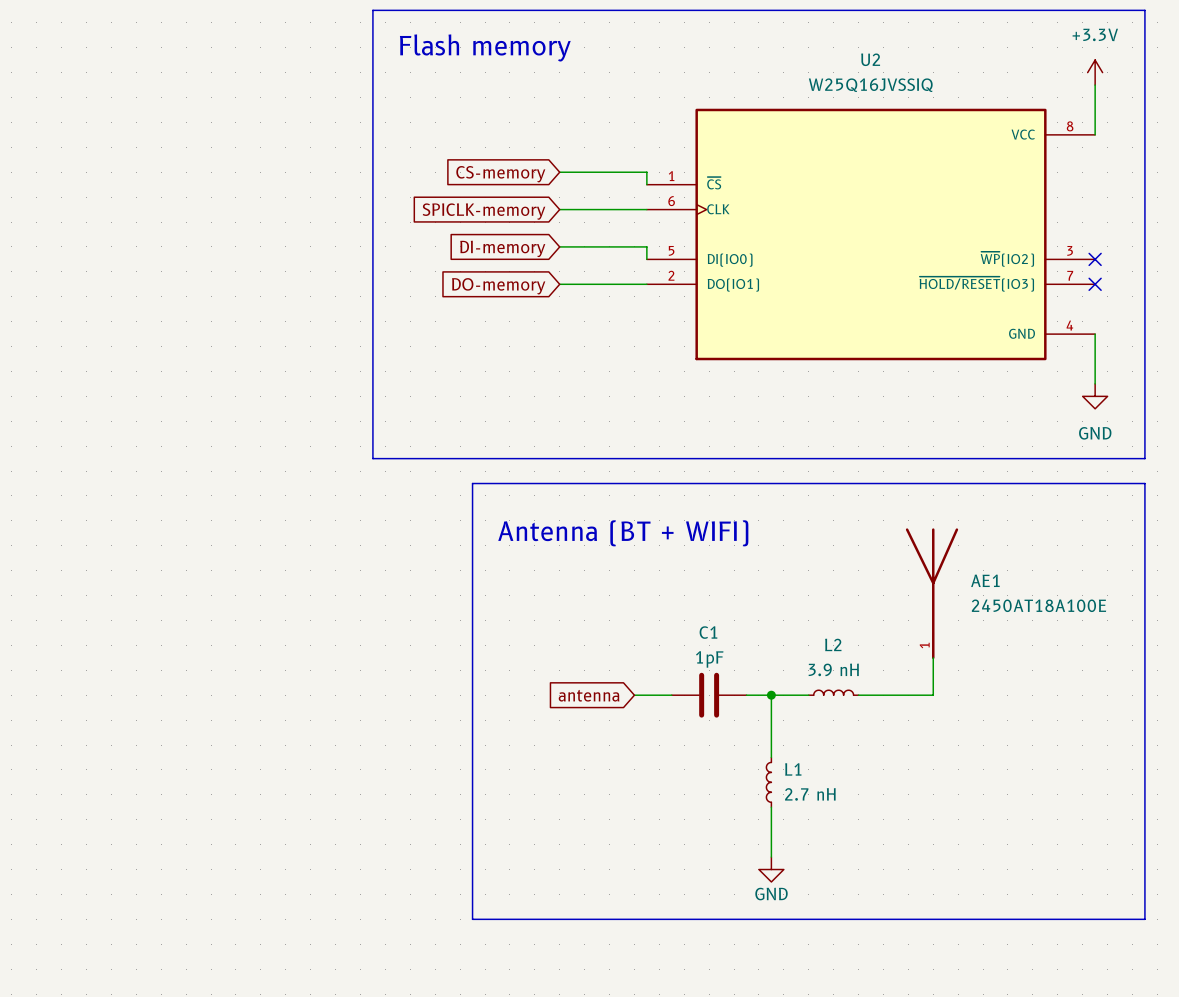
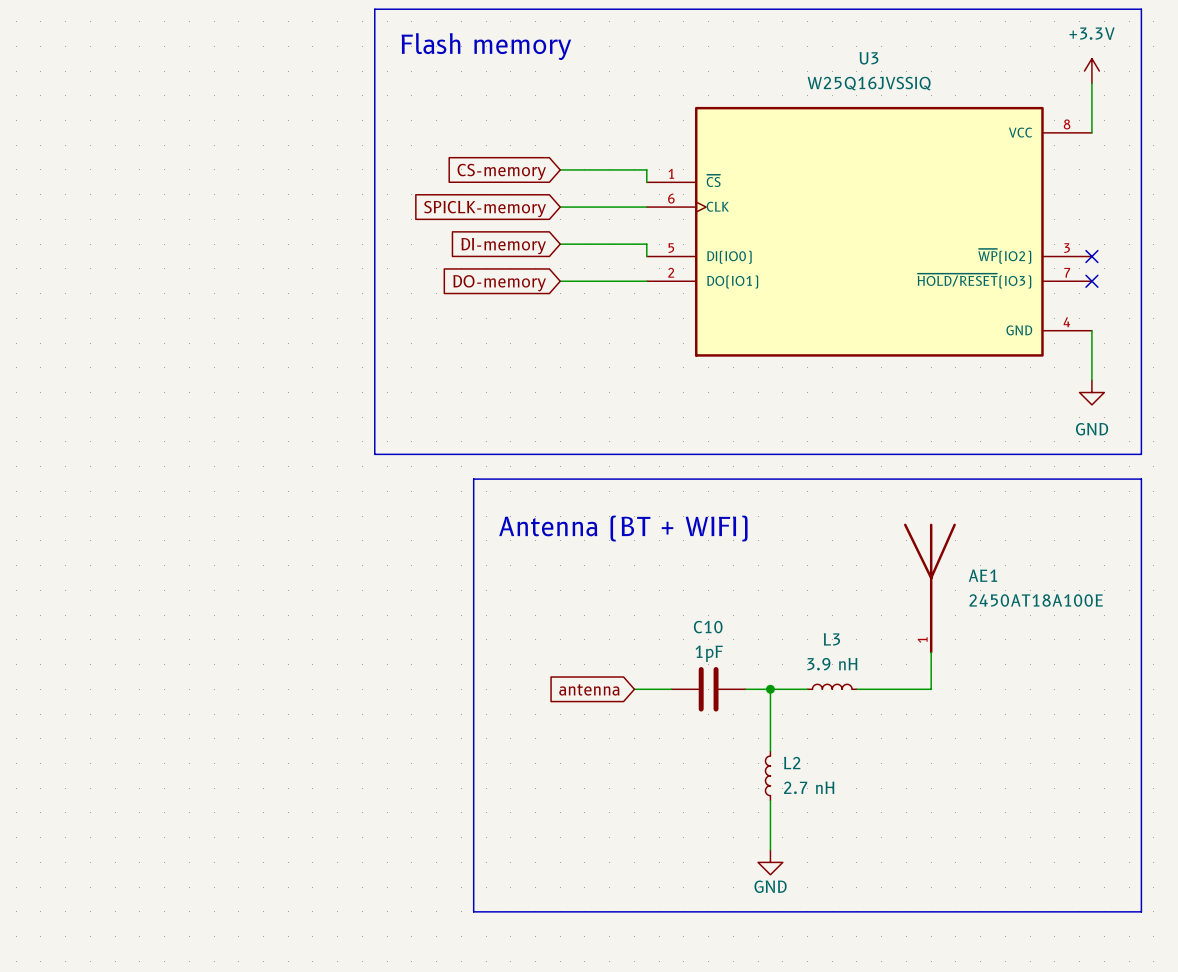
U2 name: U2 (870, 59) -> U3 (868, 58)
C1 name: C1 (708, 632) -> C10 (708, 627)
L2 name: L2 (833, 644) -> L3 (831, 639)
L1 name: L1 (793, 769) -> L2 (792, 763)

